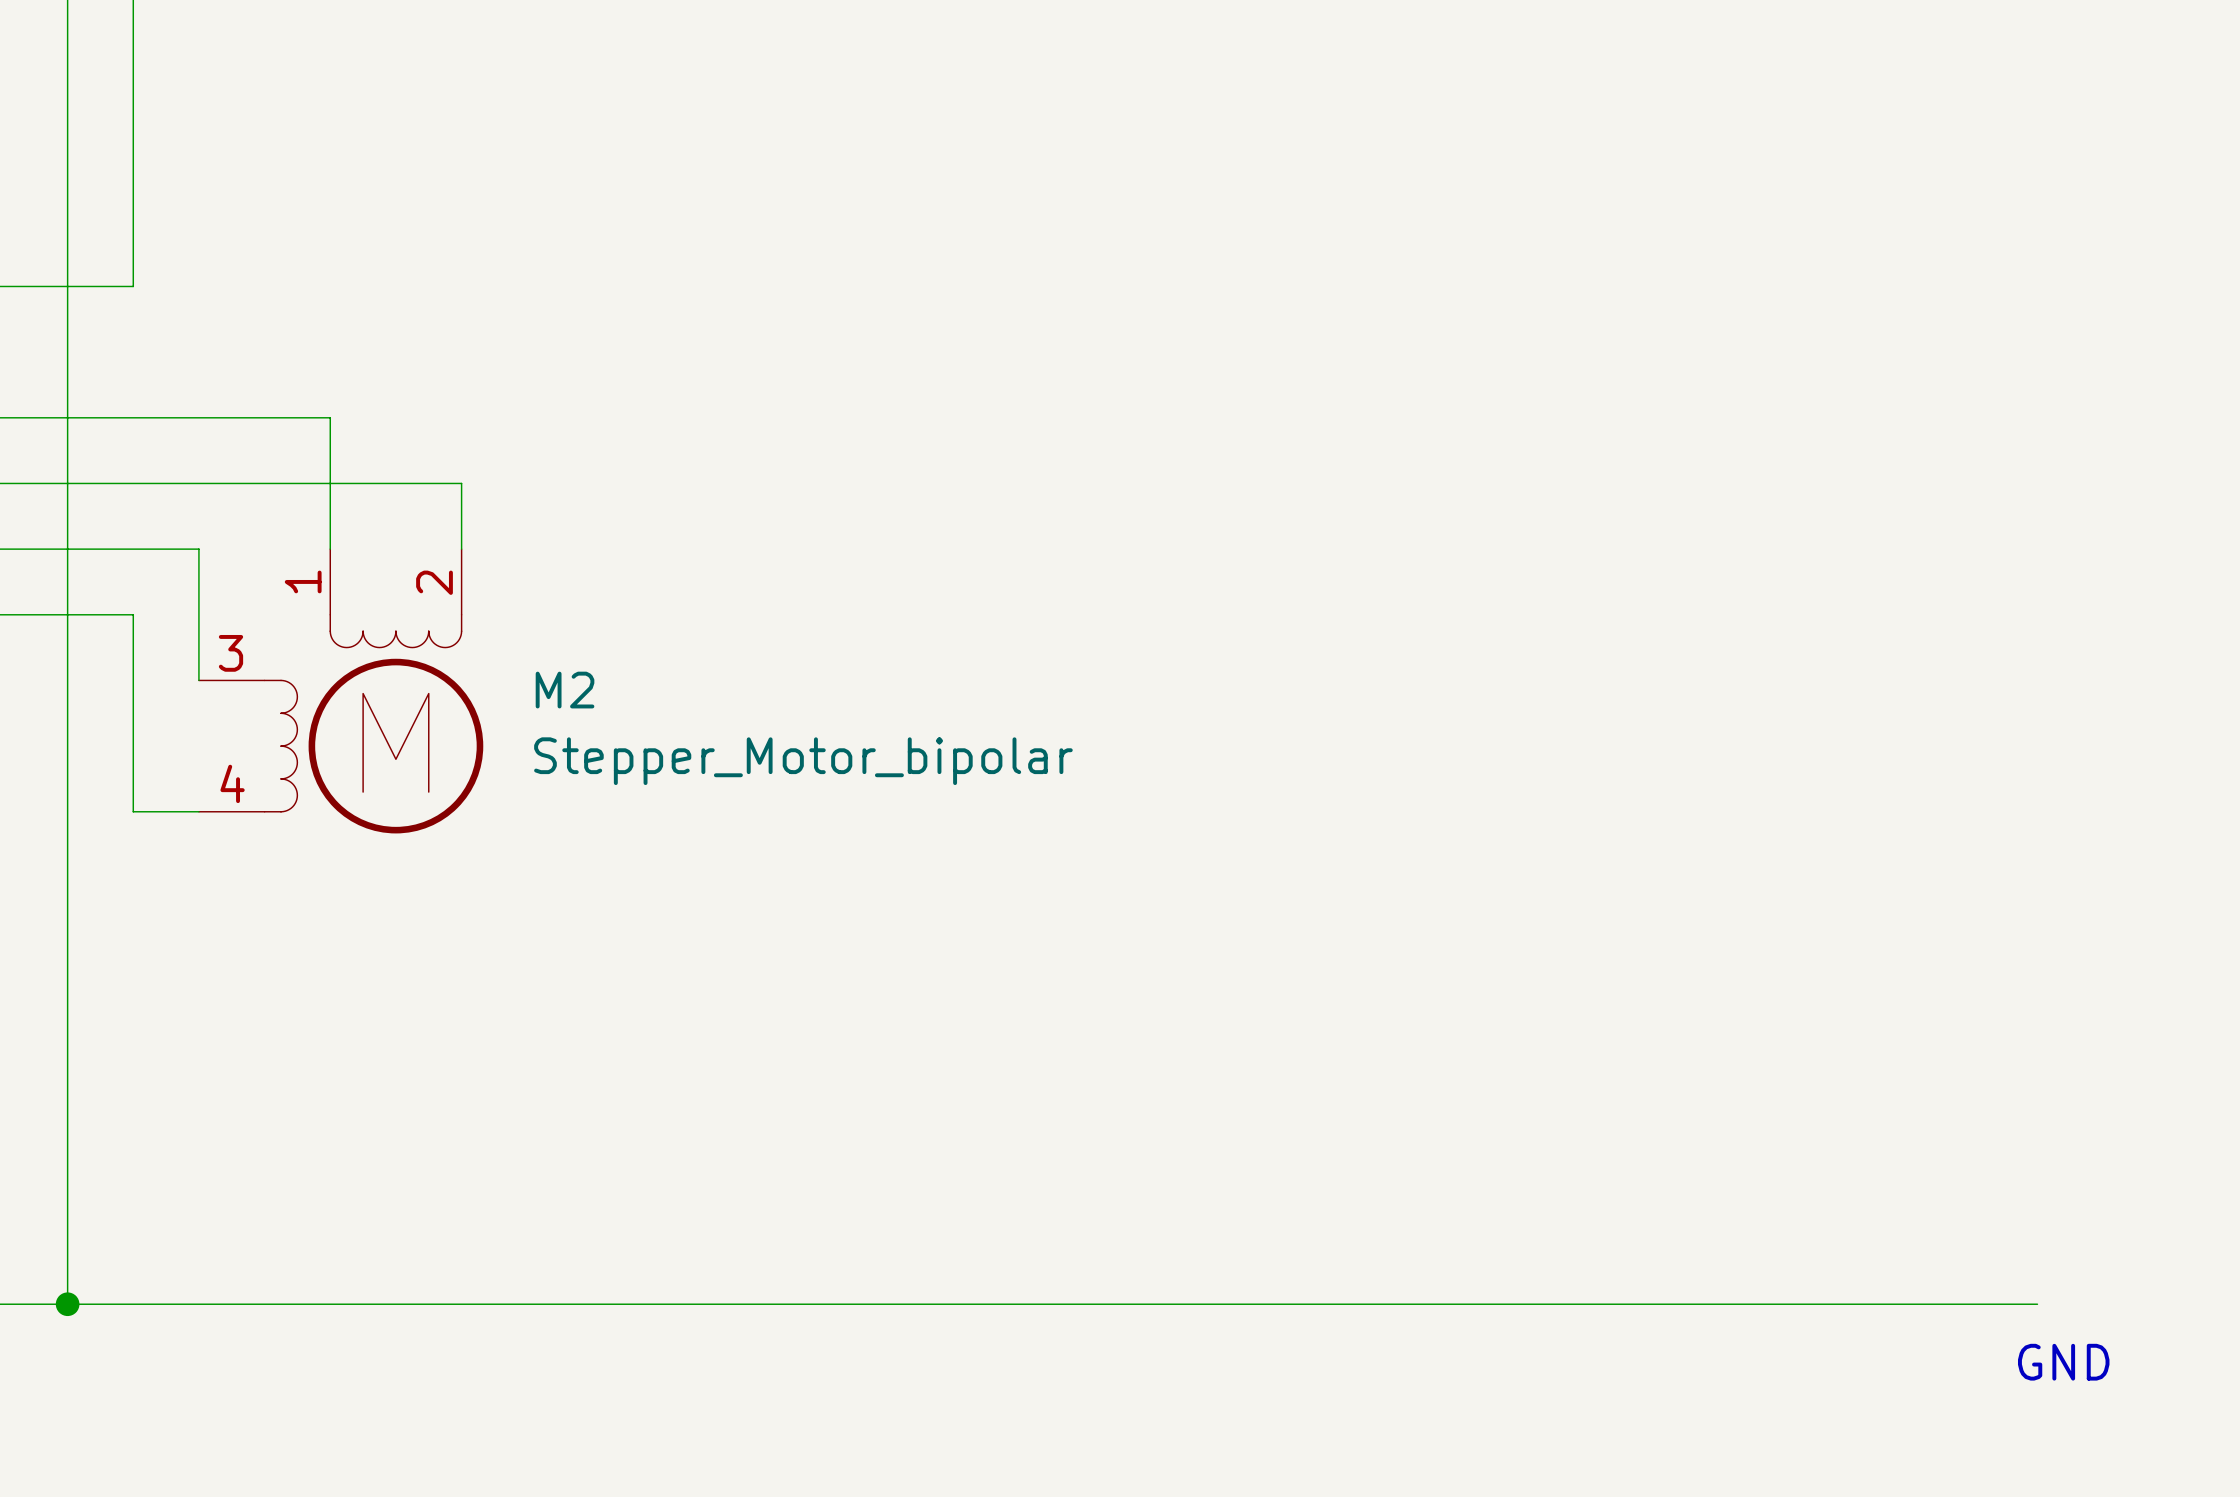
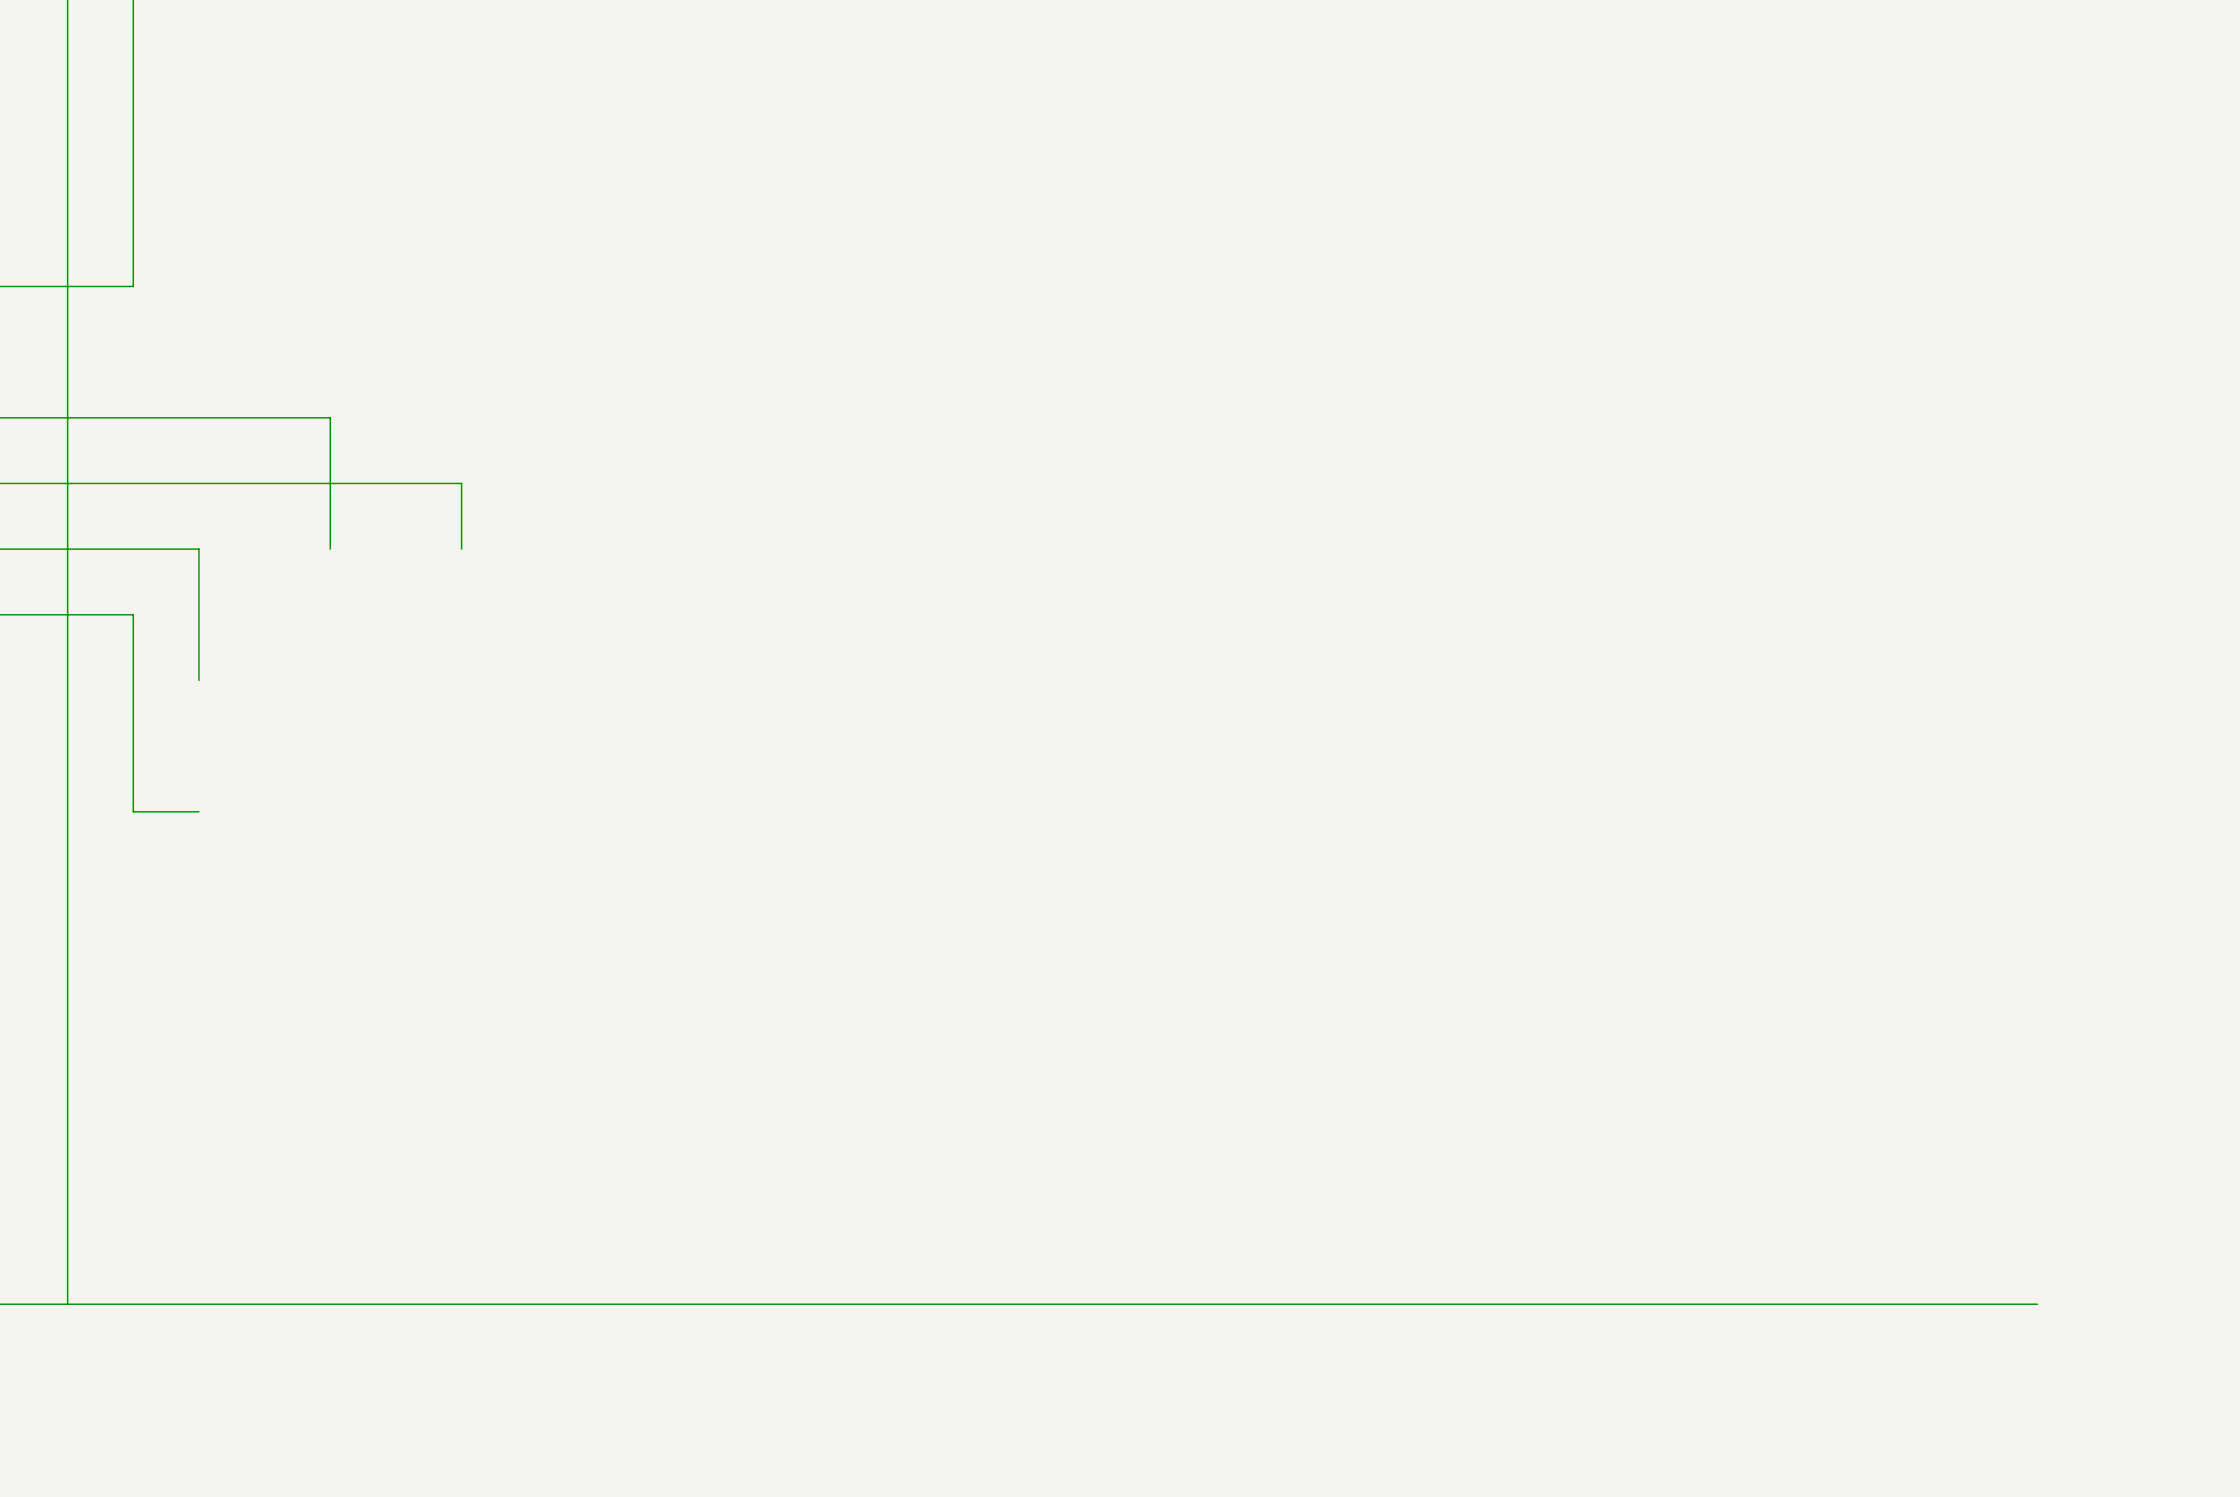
M2: Stepper_Motor_bipolar (341, 691) -> none
junction: (67, 1304) -> none
text: GND (2063, 1362) -> none

